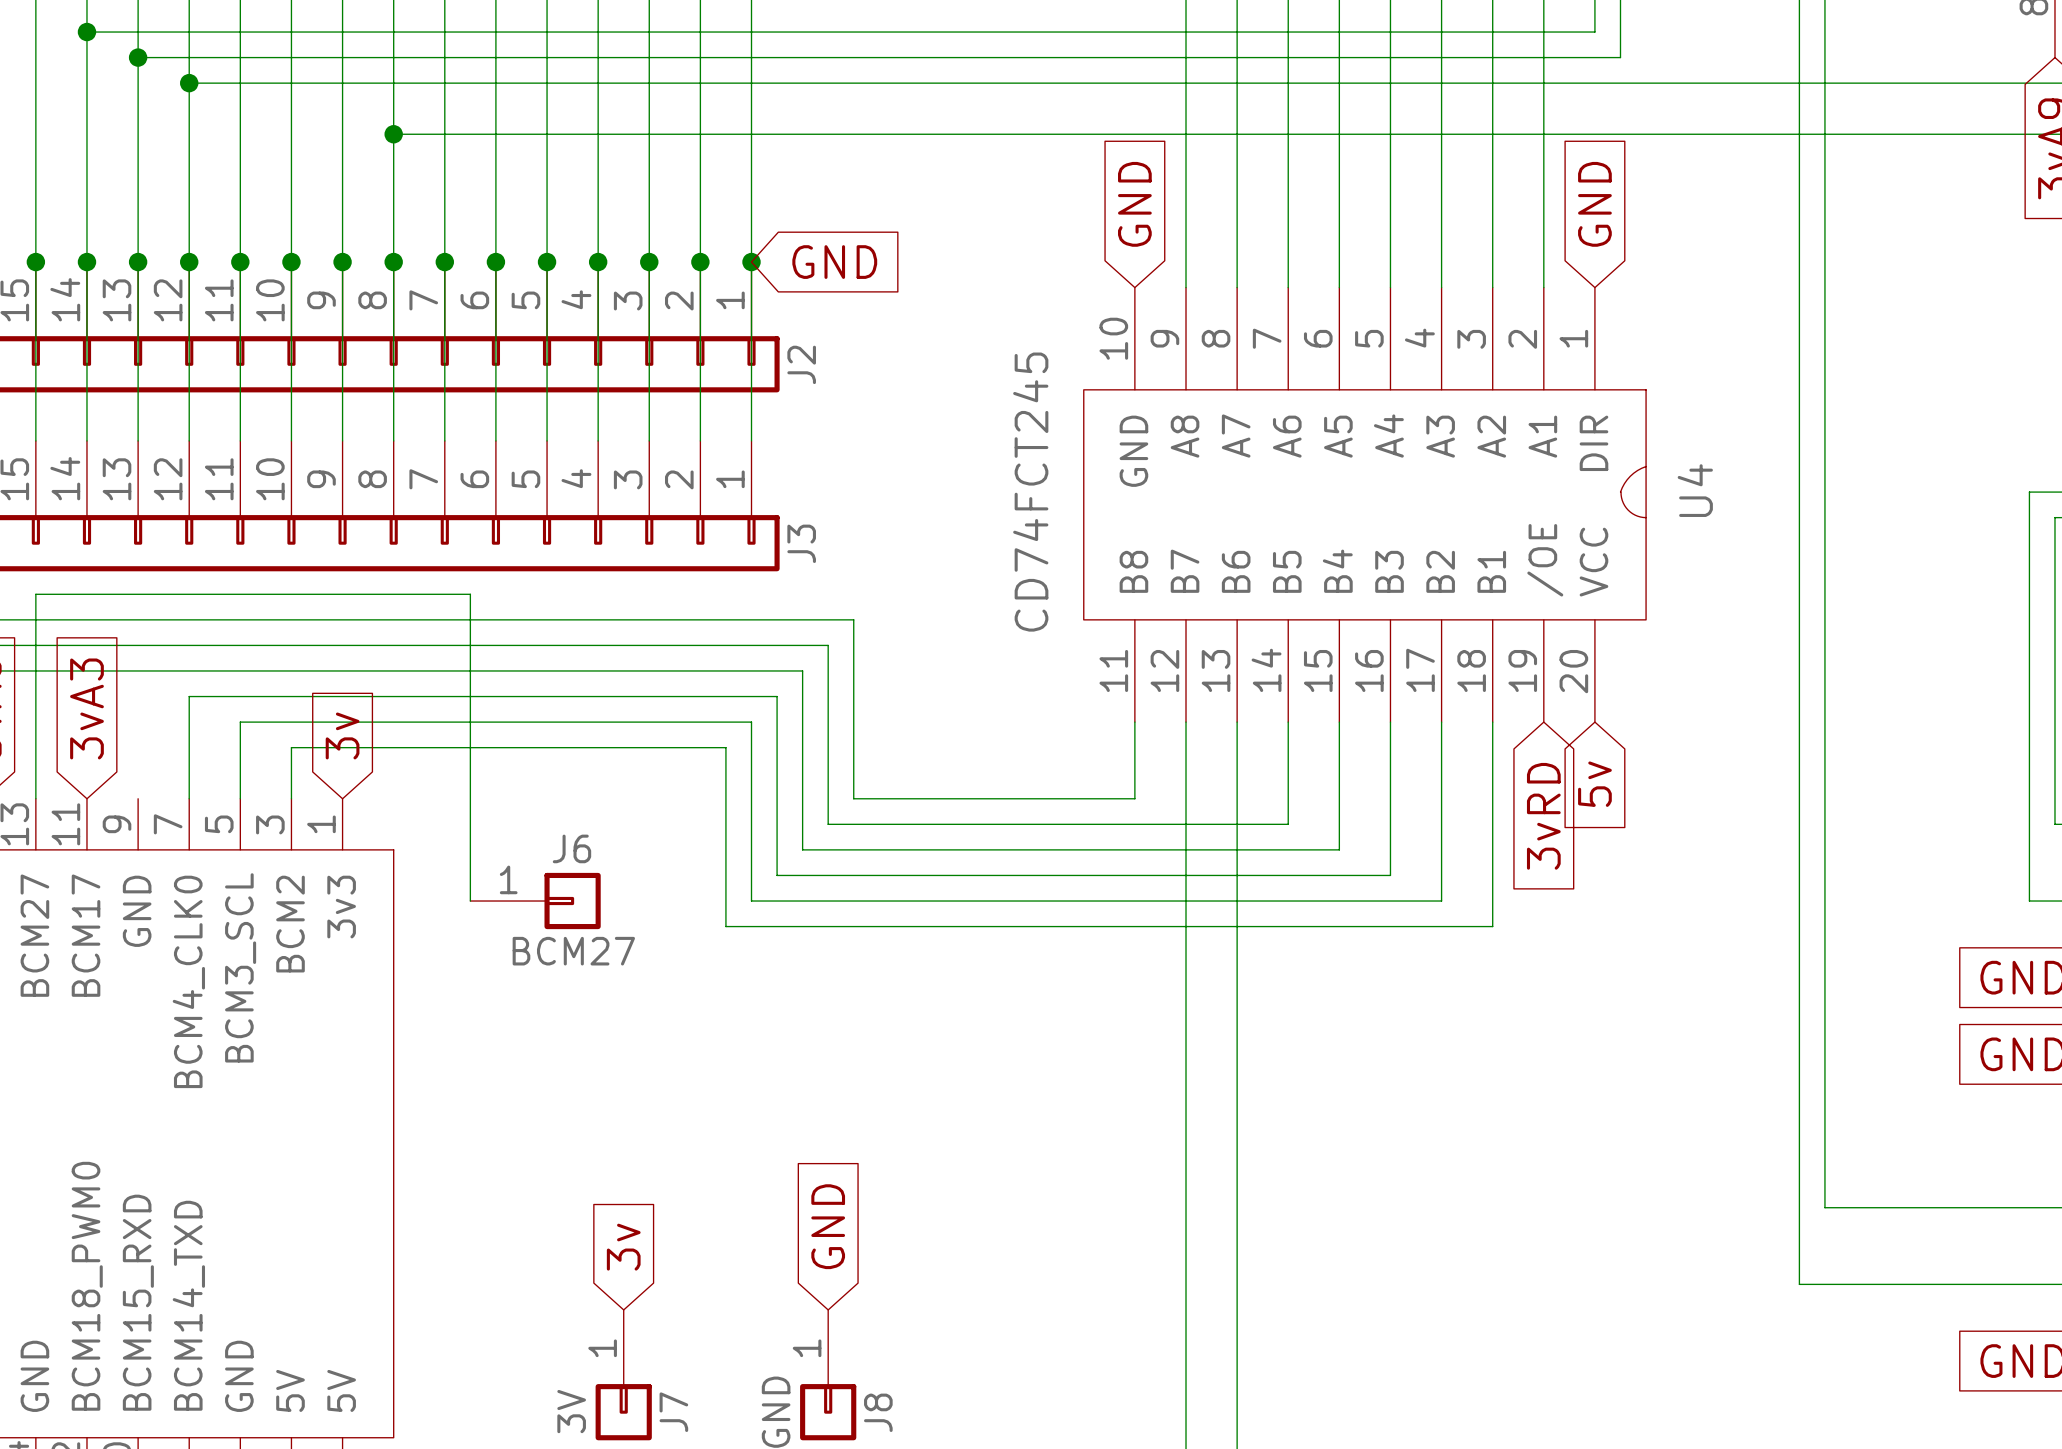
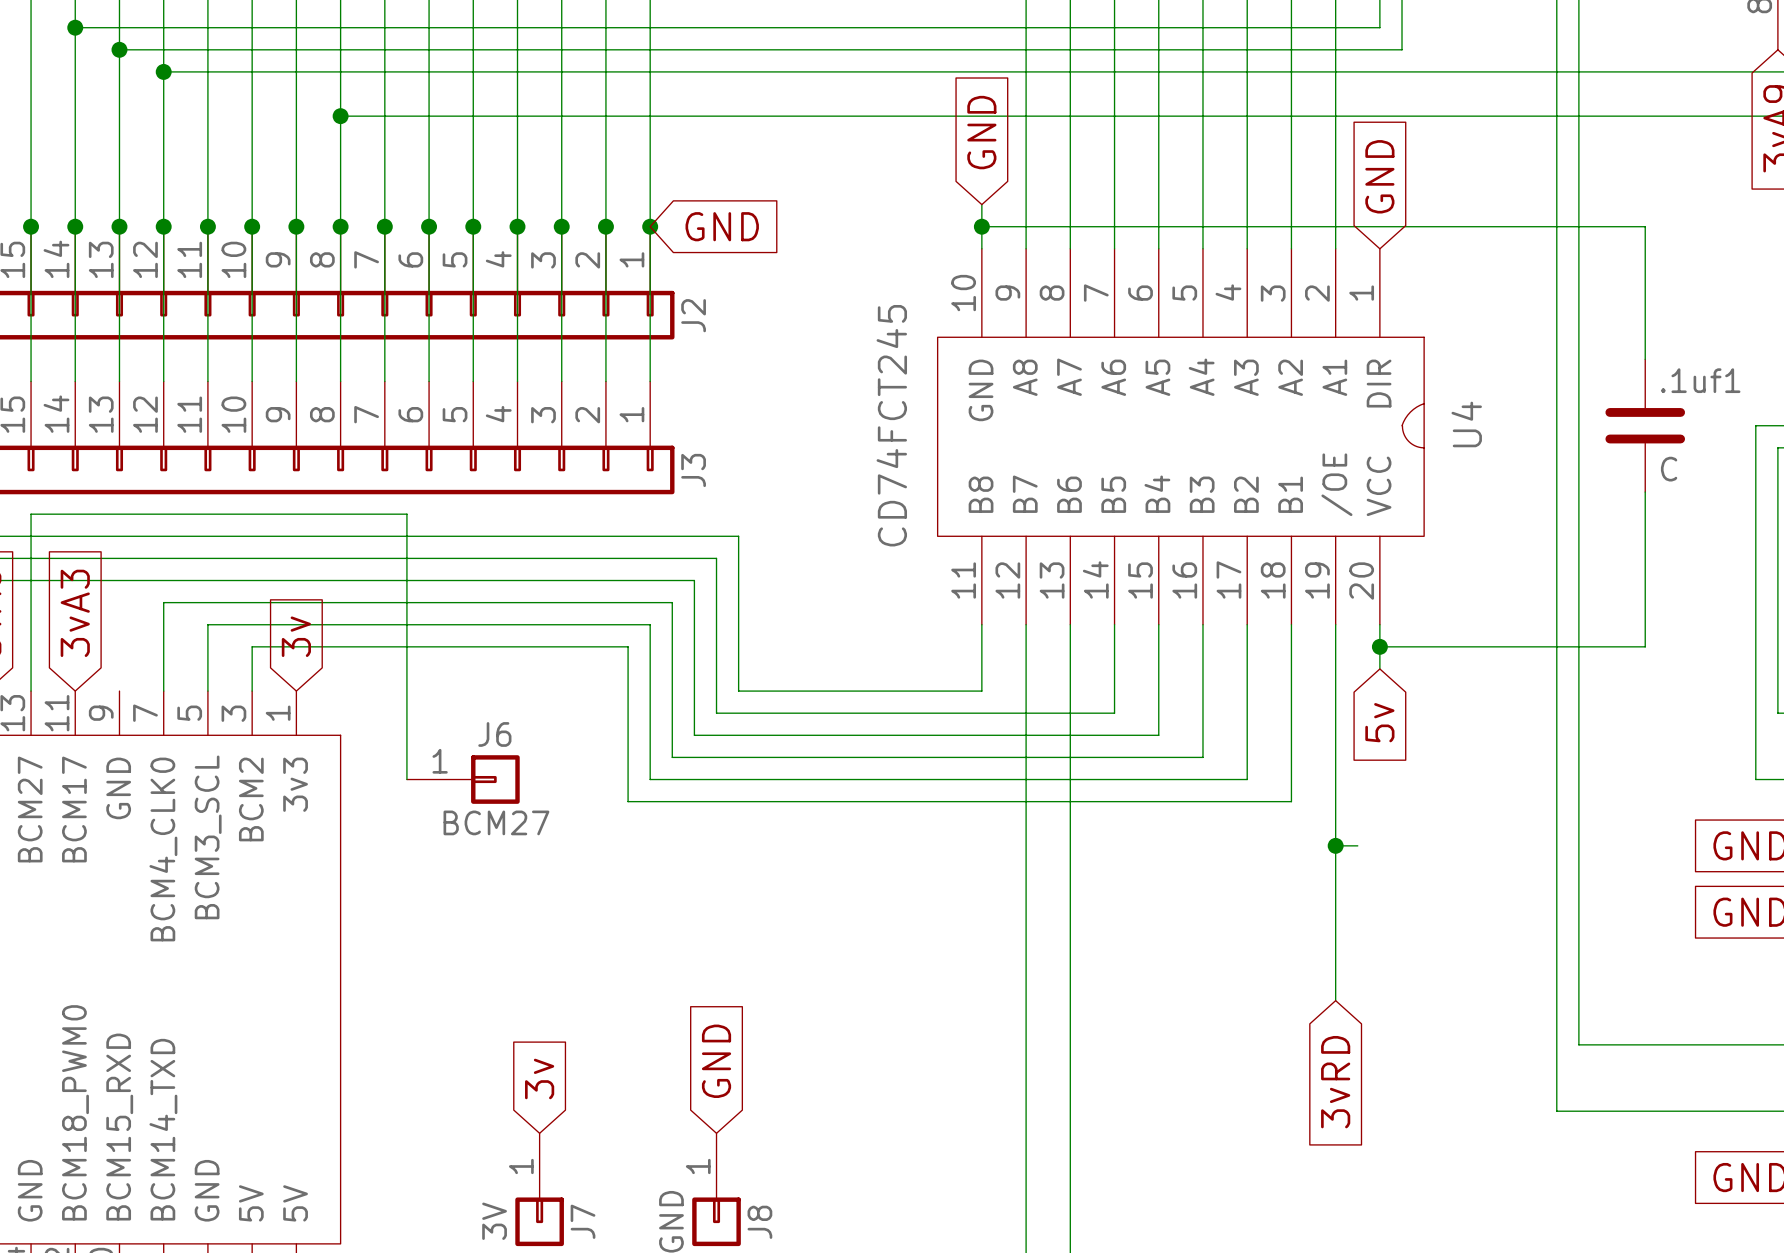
global label position: GND (1134, 204) -> GND (981, 132)
wire: none -> (981, 204) (981, 248)
wire: none -> (981, 226) (1645, 226) (1645, 359)
junction: none -> (981, 226)
.1uf1: none -> C (1645, 425)
wire: none -> (1645, 492) (1645, 646) (1379, 646)
wire: none -> (1335, 624) (1335, 1000)
wire: none -> (1379, 624) (1379, 668)
junction: none -> (1379, 646)
global label position: 5v (1594, 784) -> 5v (1379, 722)
global label position: 3vRD (1543, 816) -> 3vRD (1335, 1082)
wire: none -> (1335, 845) (1357, 845)
junction: none -> (1335, 845)

